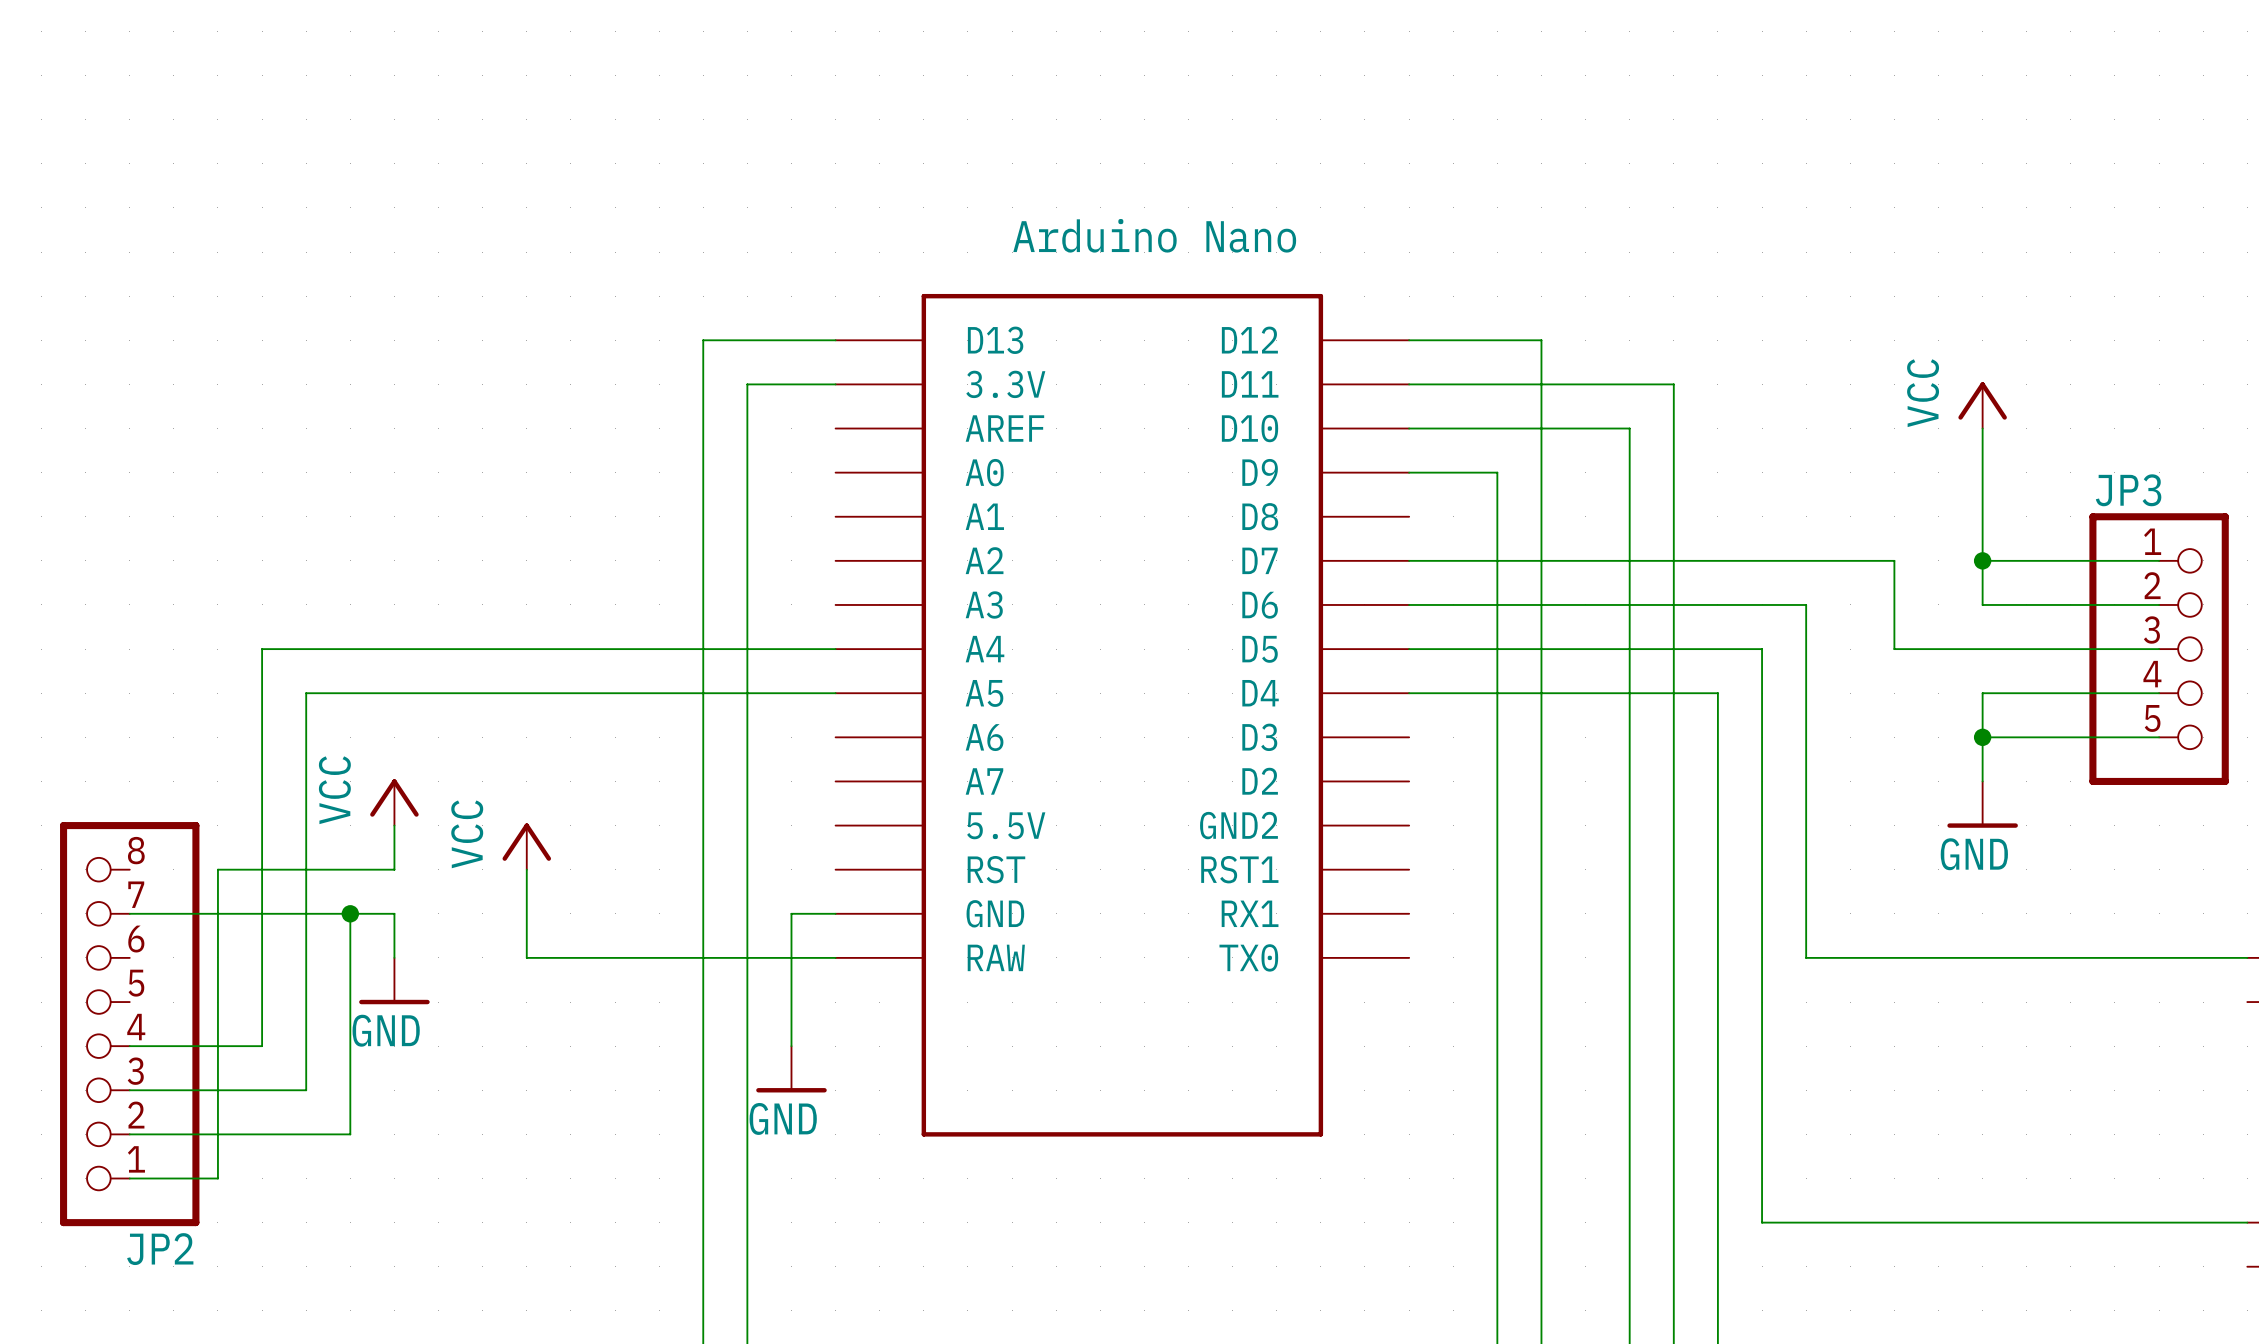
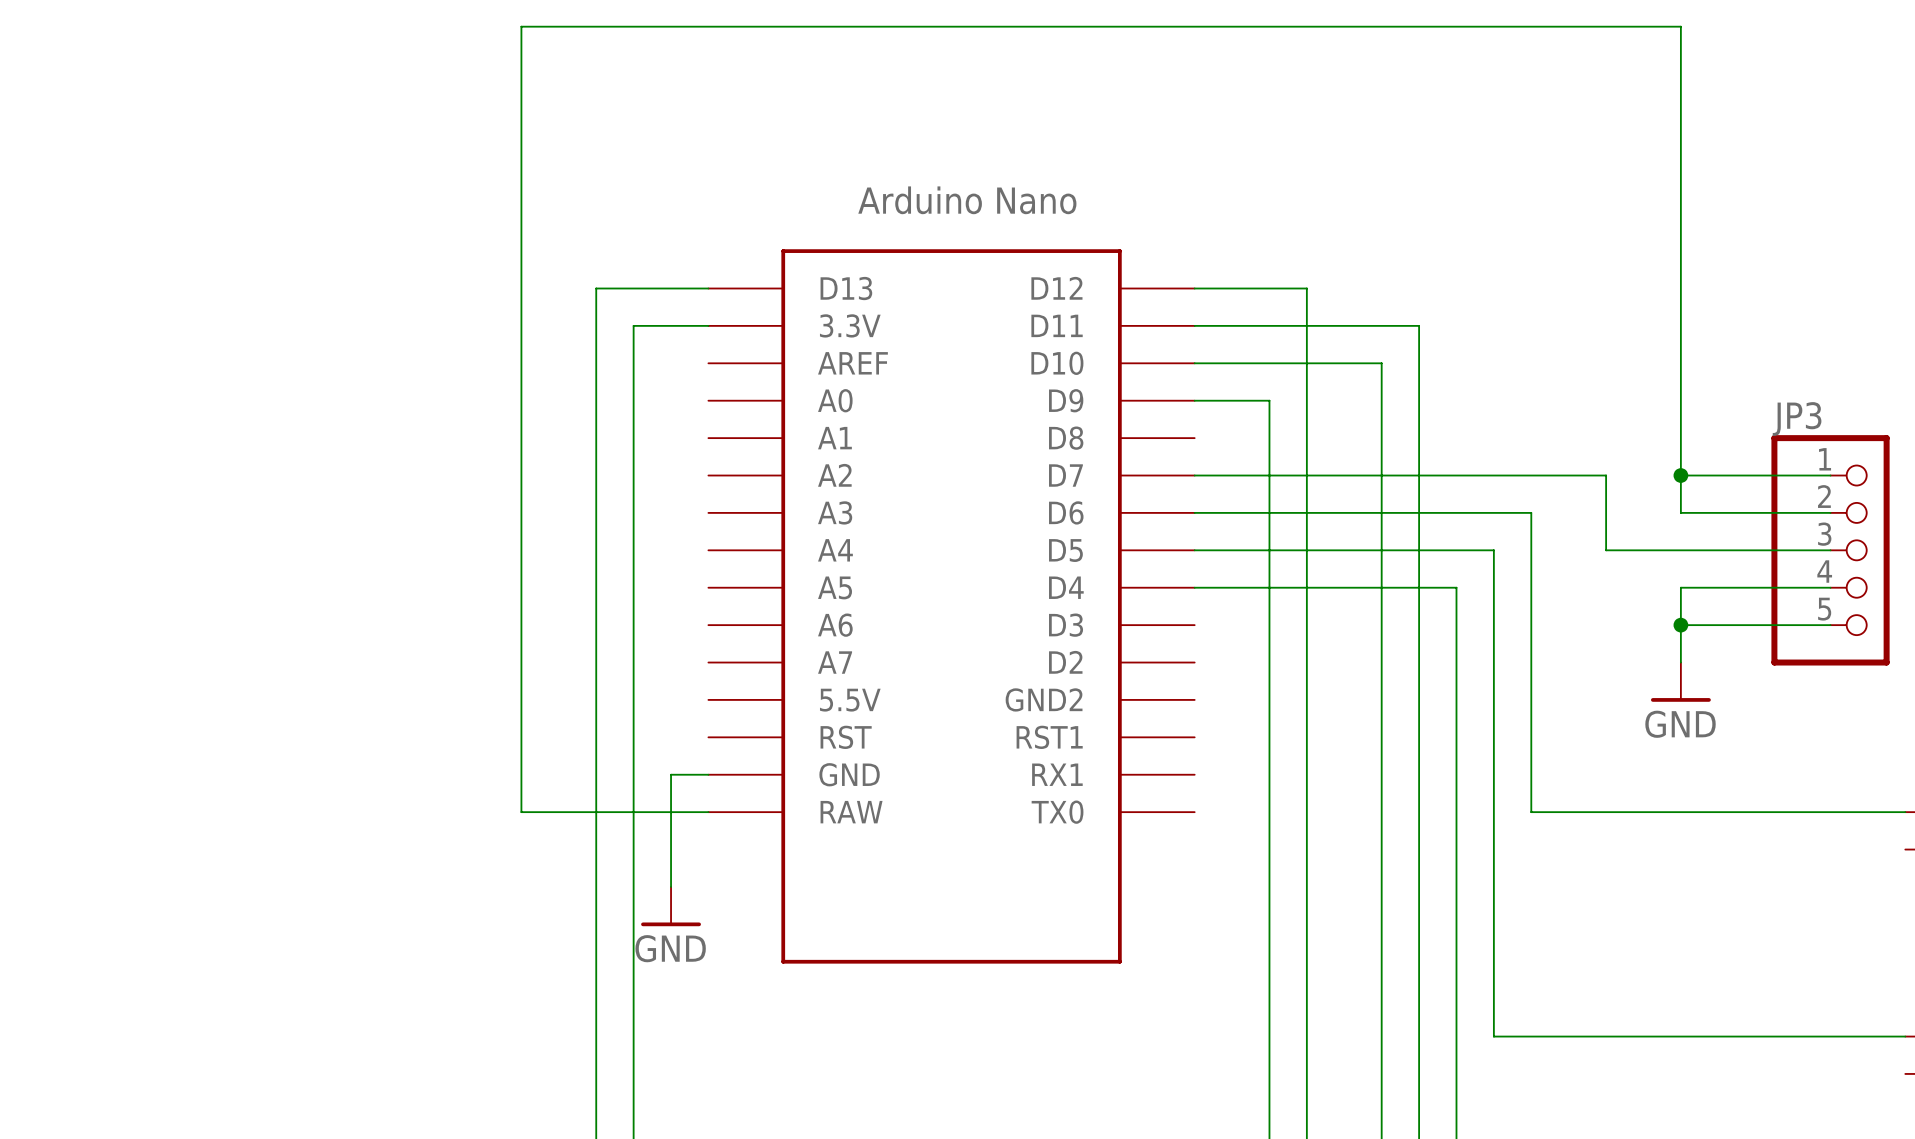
power symbol: VCC (1982, 405) -> none
wire: (835, 649) (262, 649) (262, 1046) (129, 1046) -> none
wire: (835, 693) (306, 693) (306, 1090) (129, 1090) -> none
power symbol: VCC (394, 802) -> none
wire: (394, 825) (394, 869) (217, 869) (217, 1178) (129, 1178) -> none
power symbol: VCC (526, 846) -> none
wire: (526, 869) (526, 957) (615, 957) -> (1680, 363) (1680, 26) (521, 26) (521, 812)
wire: (129, 913) (394, 913) (394, 957) -> none
wire: (350, 913) (350, 1134) (129, 1134) -> none
junction: (350, 913) -> none
power symbol: GND (394, 981) -> none
JP2: (129, 1024) -> none

